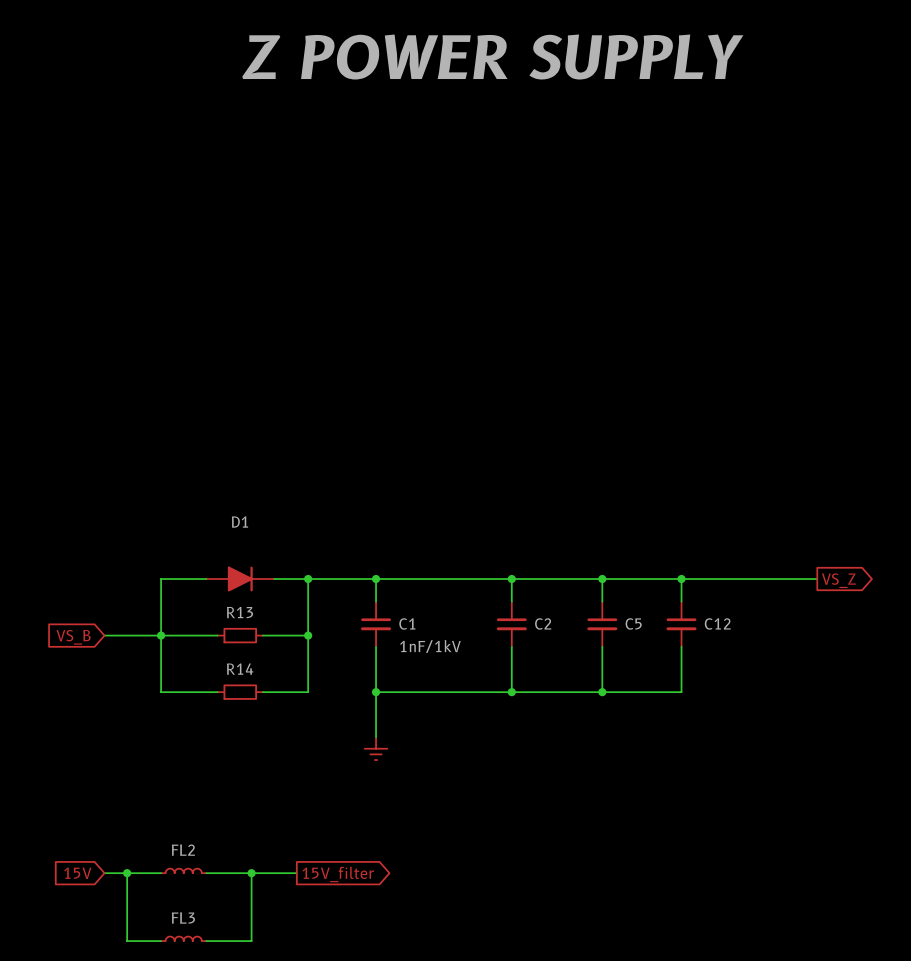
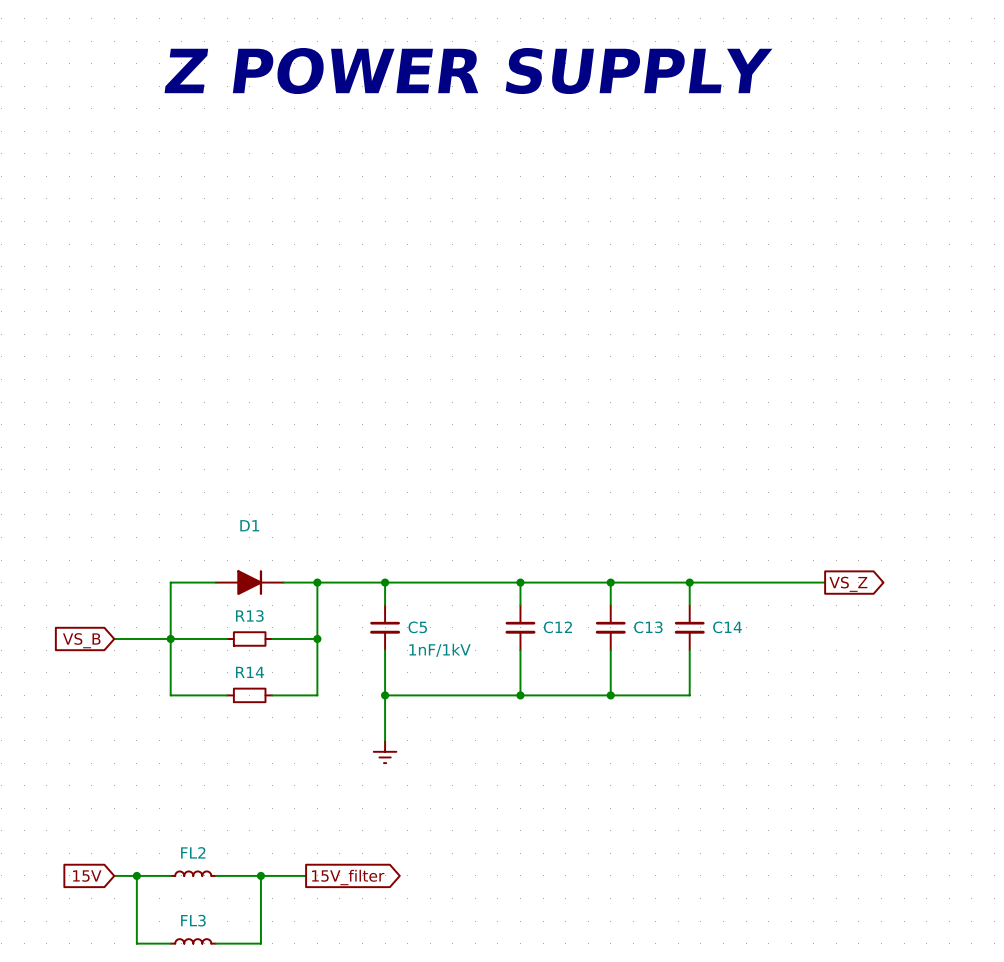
label: Z POWER SUPPLY (492, 57) -> none
text: none -> Z POWER SUPPLY (468, 71)
C1 name: C1 (407, 623) -> C5 (417, 627)
C2 name: C2 (543, 623) -> C12 (557, 627)
C5 name: C5 (633, 623) -> C13 (648, 627)
C12 name: C12 (717, 623) -> C14 (727, 627)

